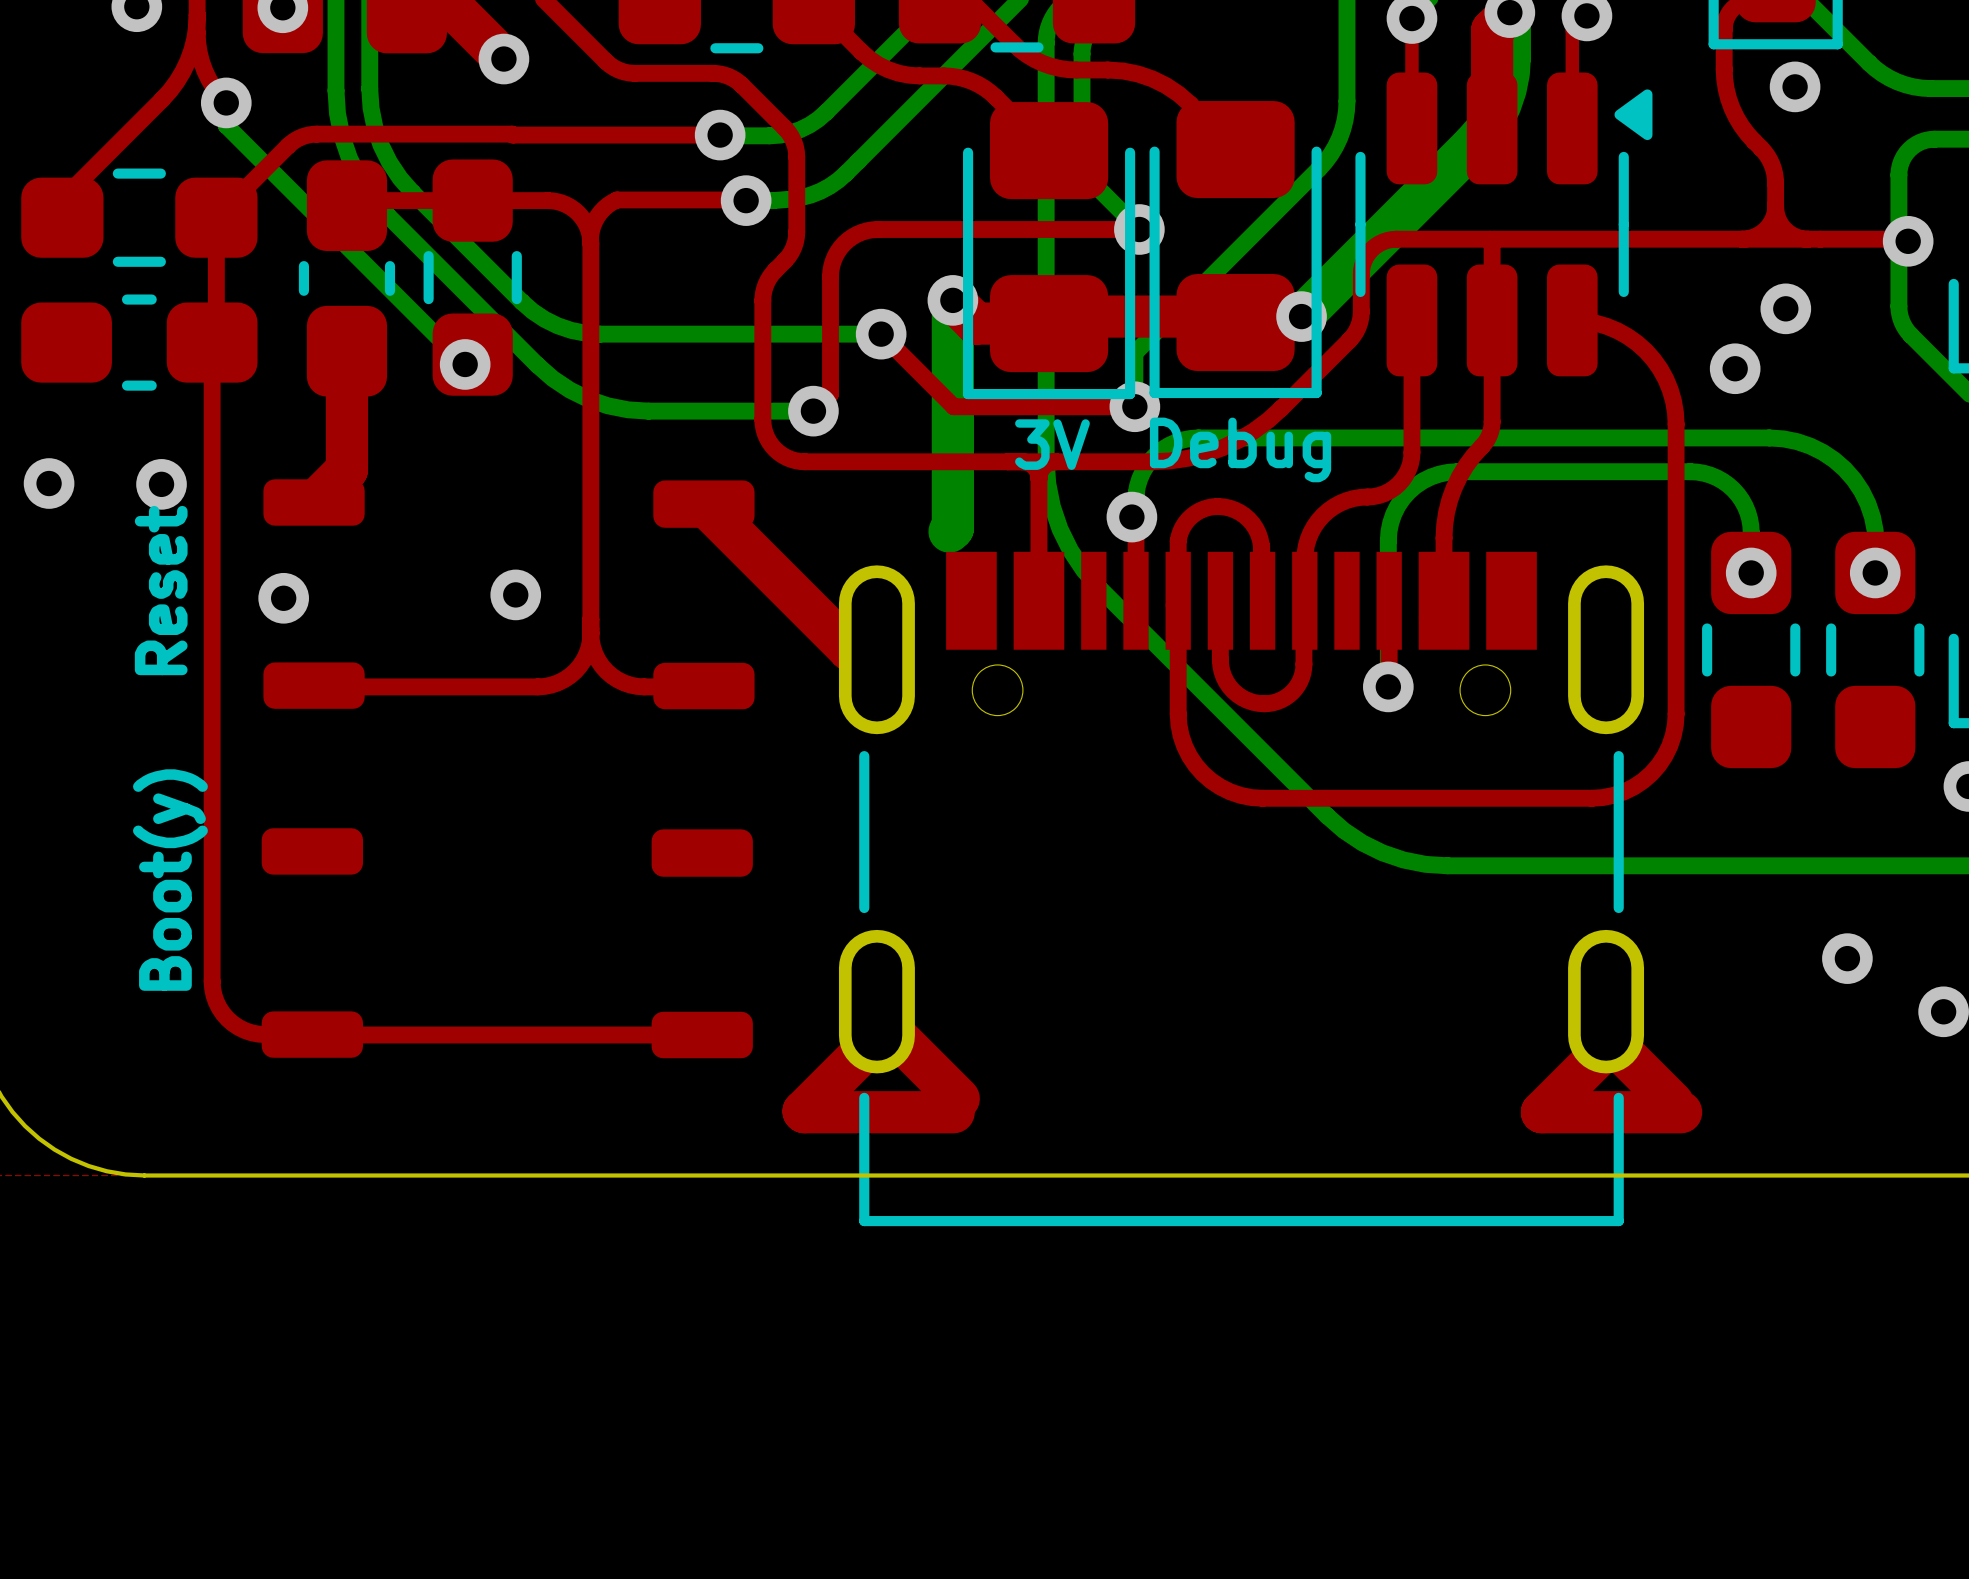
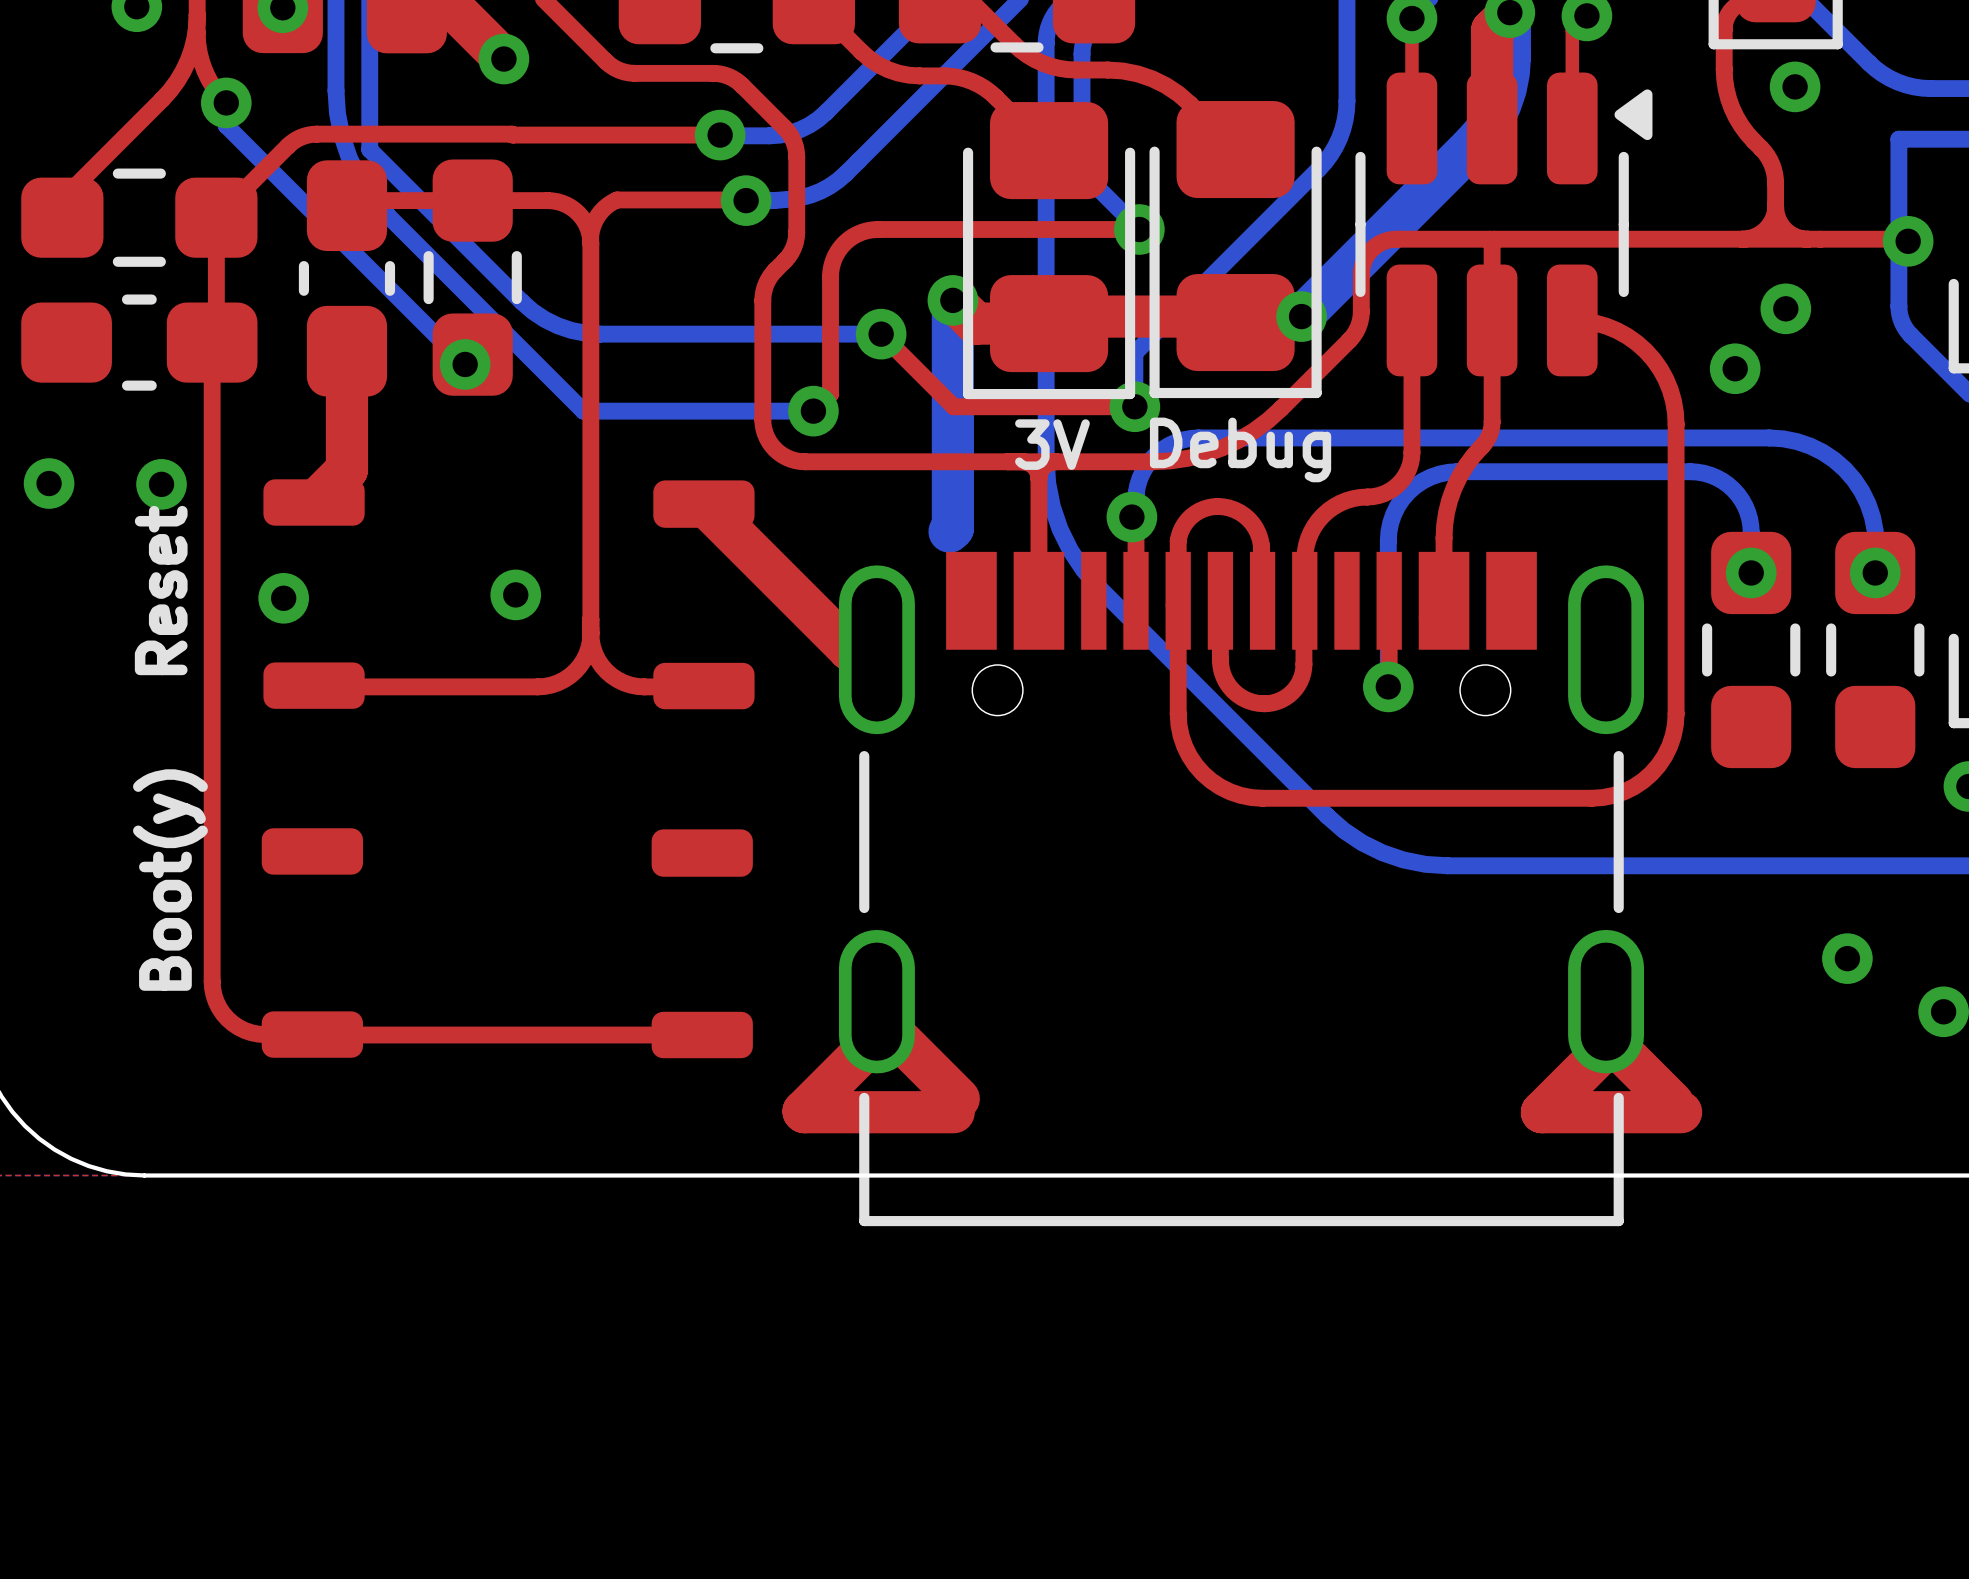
bottom track: (369, 88) (371, 107) (380, 145) (400, 178) (412, 192) -> (369, 88) (369, 149) (412, 192)
bottom track: (1934, 139) (1920, 141) (1909, 149) (1901, 161) (1898, 174) -> (1934, 139) (1898, 139) (1898, 174)
bottom track: (537, 365) (569, 390) (588, 399) (607, 405) (648, 411) -> (537, 365) (583, 411) (648, 411)

